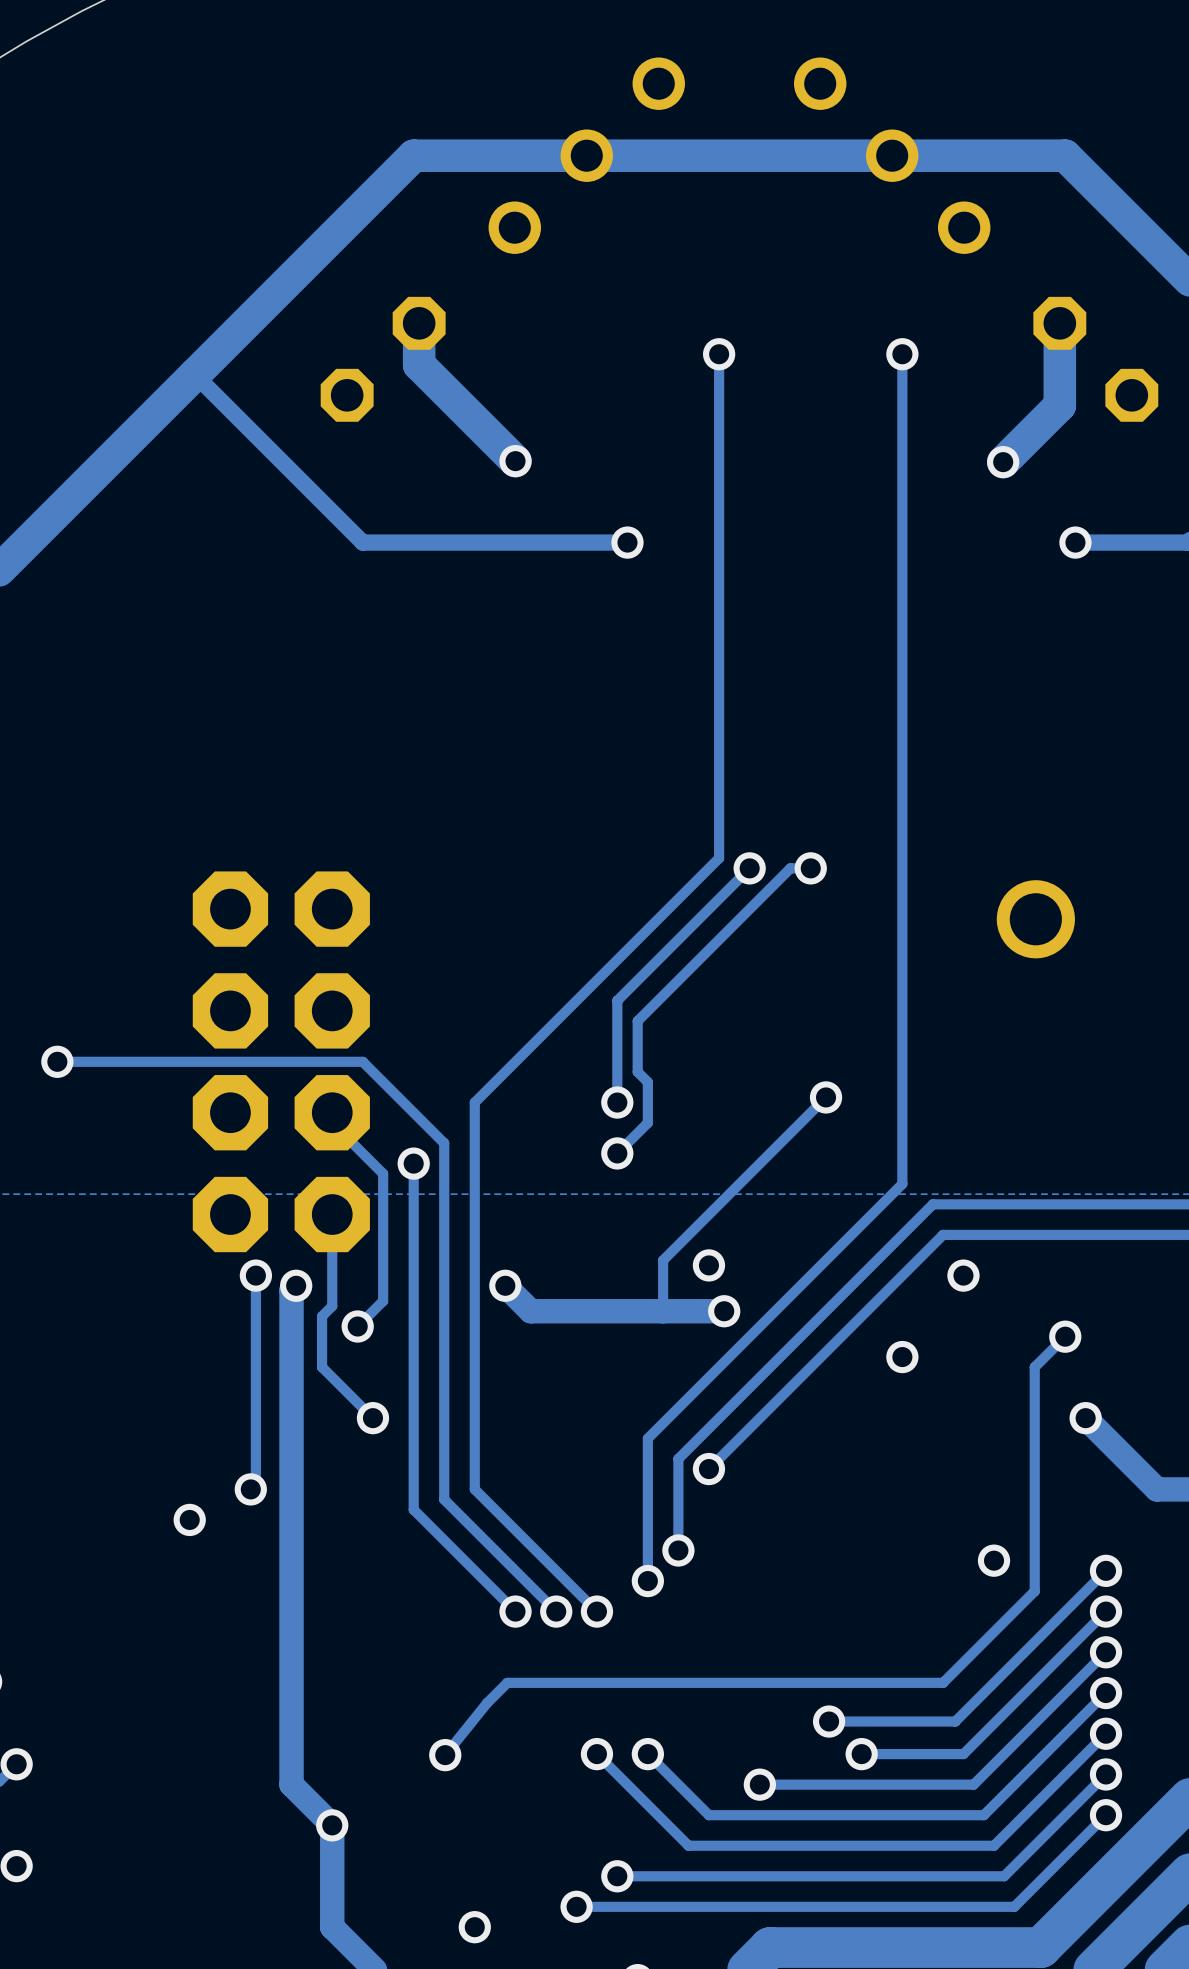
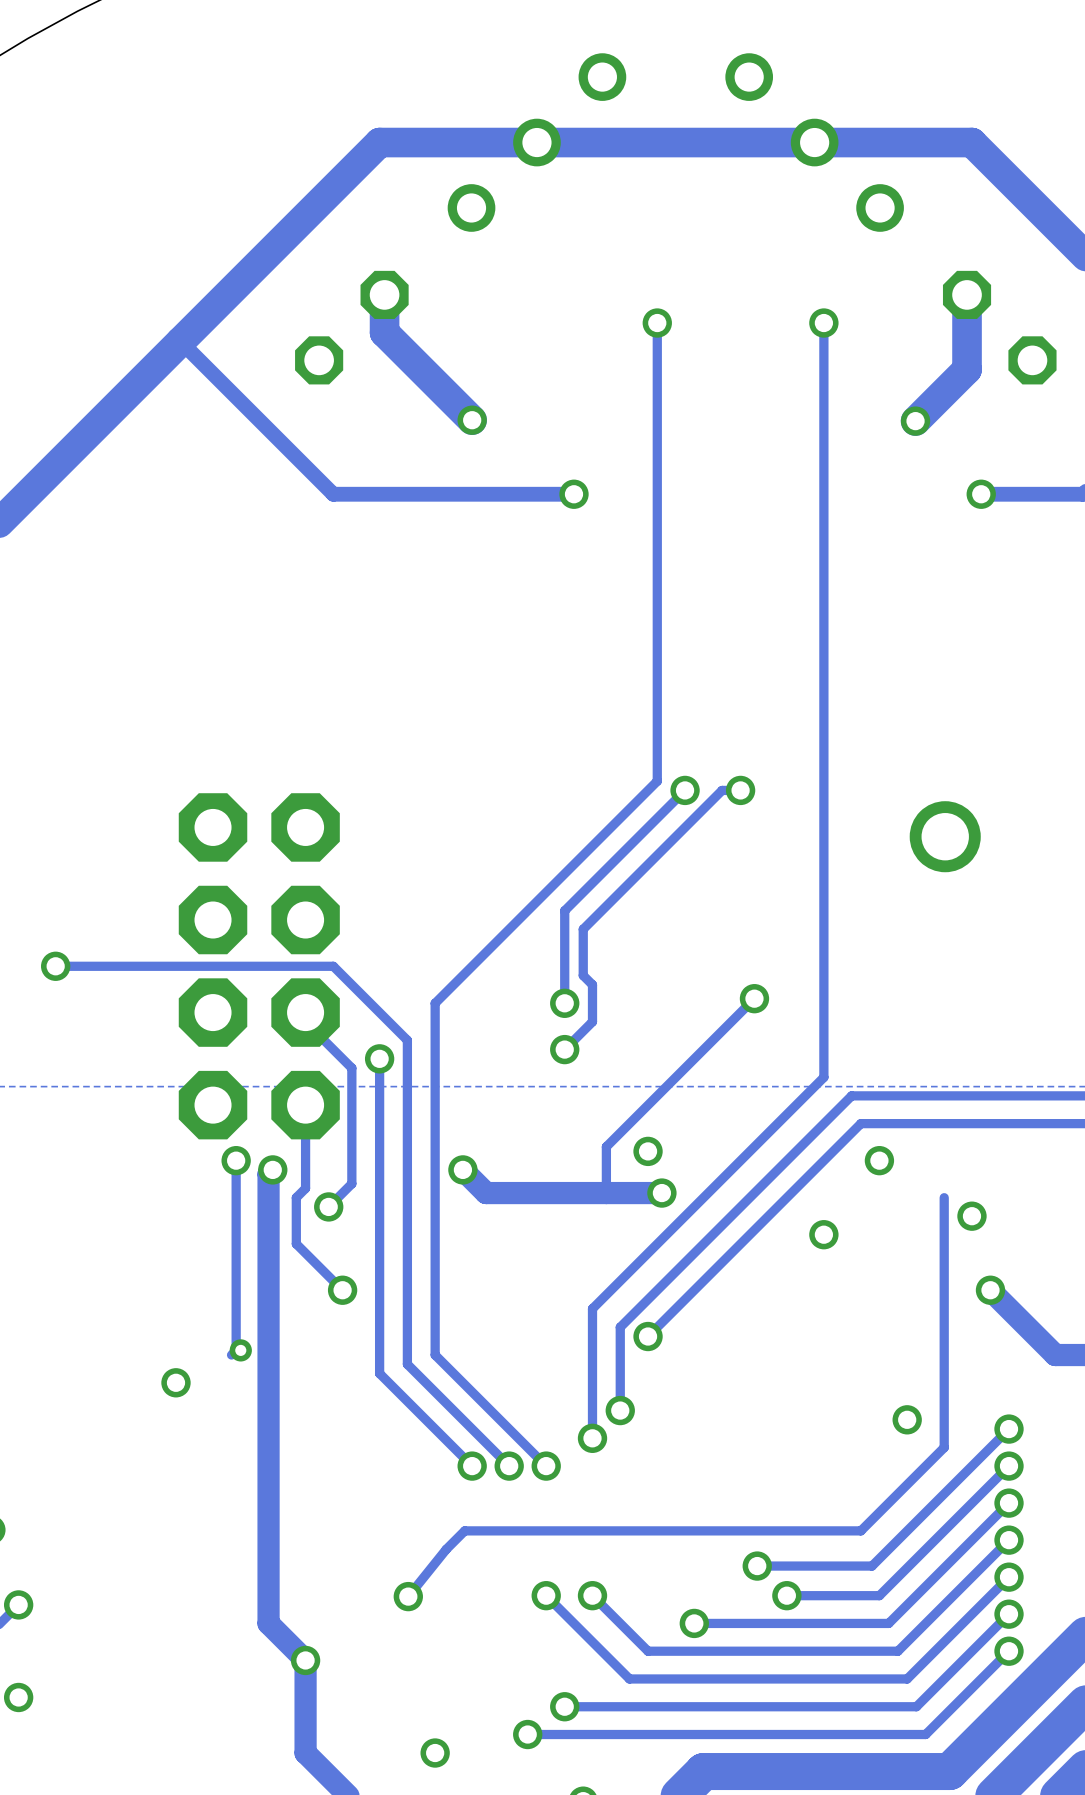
track: (1065, 1336) (1034, 1367) -> (944, 1197) (944, 1243)
via size: [234, 1473, 267, 1506] -> [229, 1339, 252, 1362]

